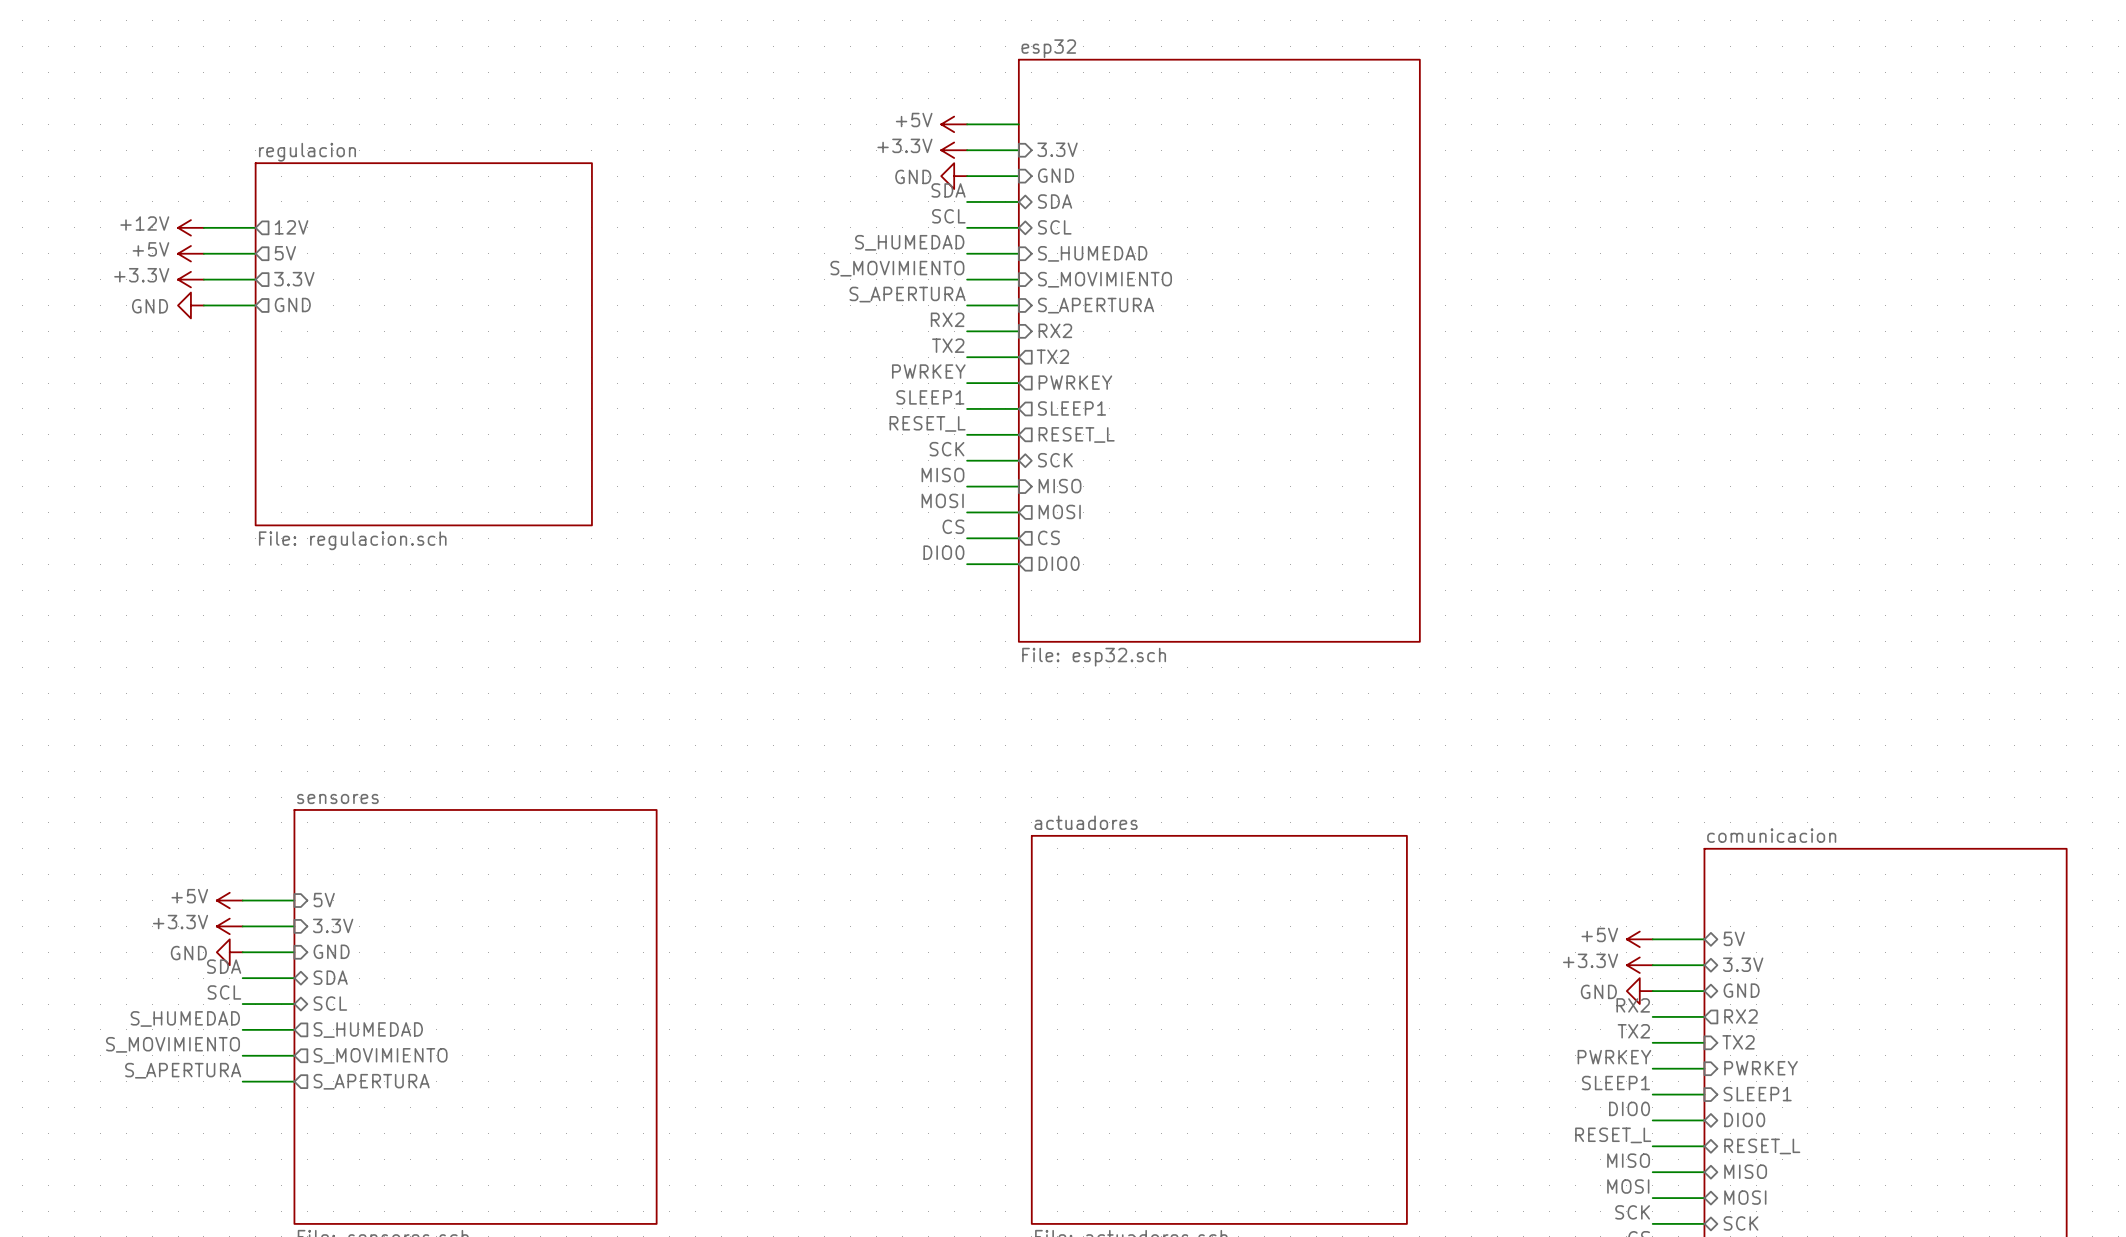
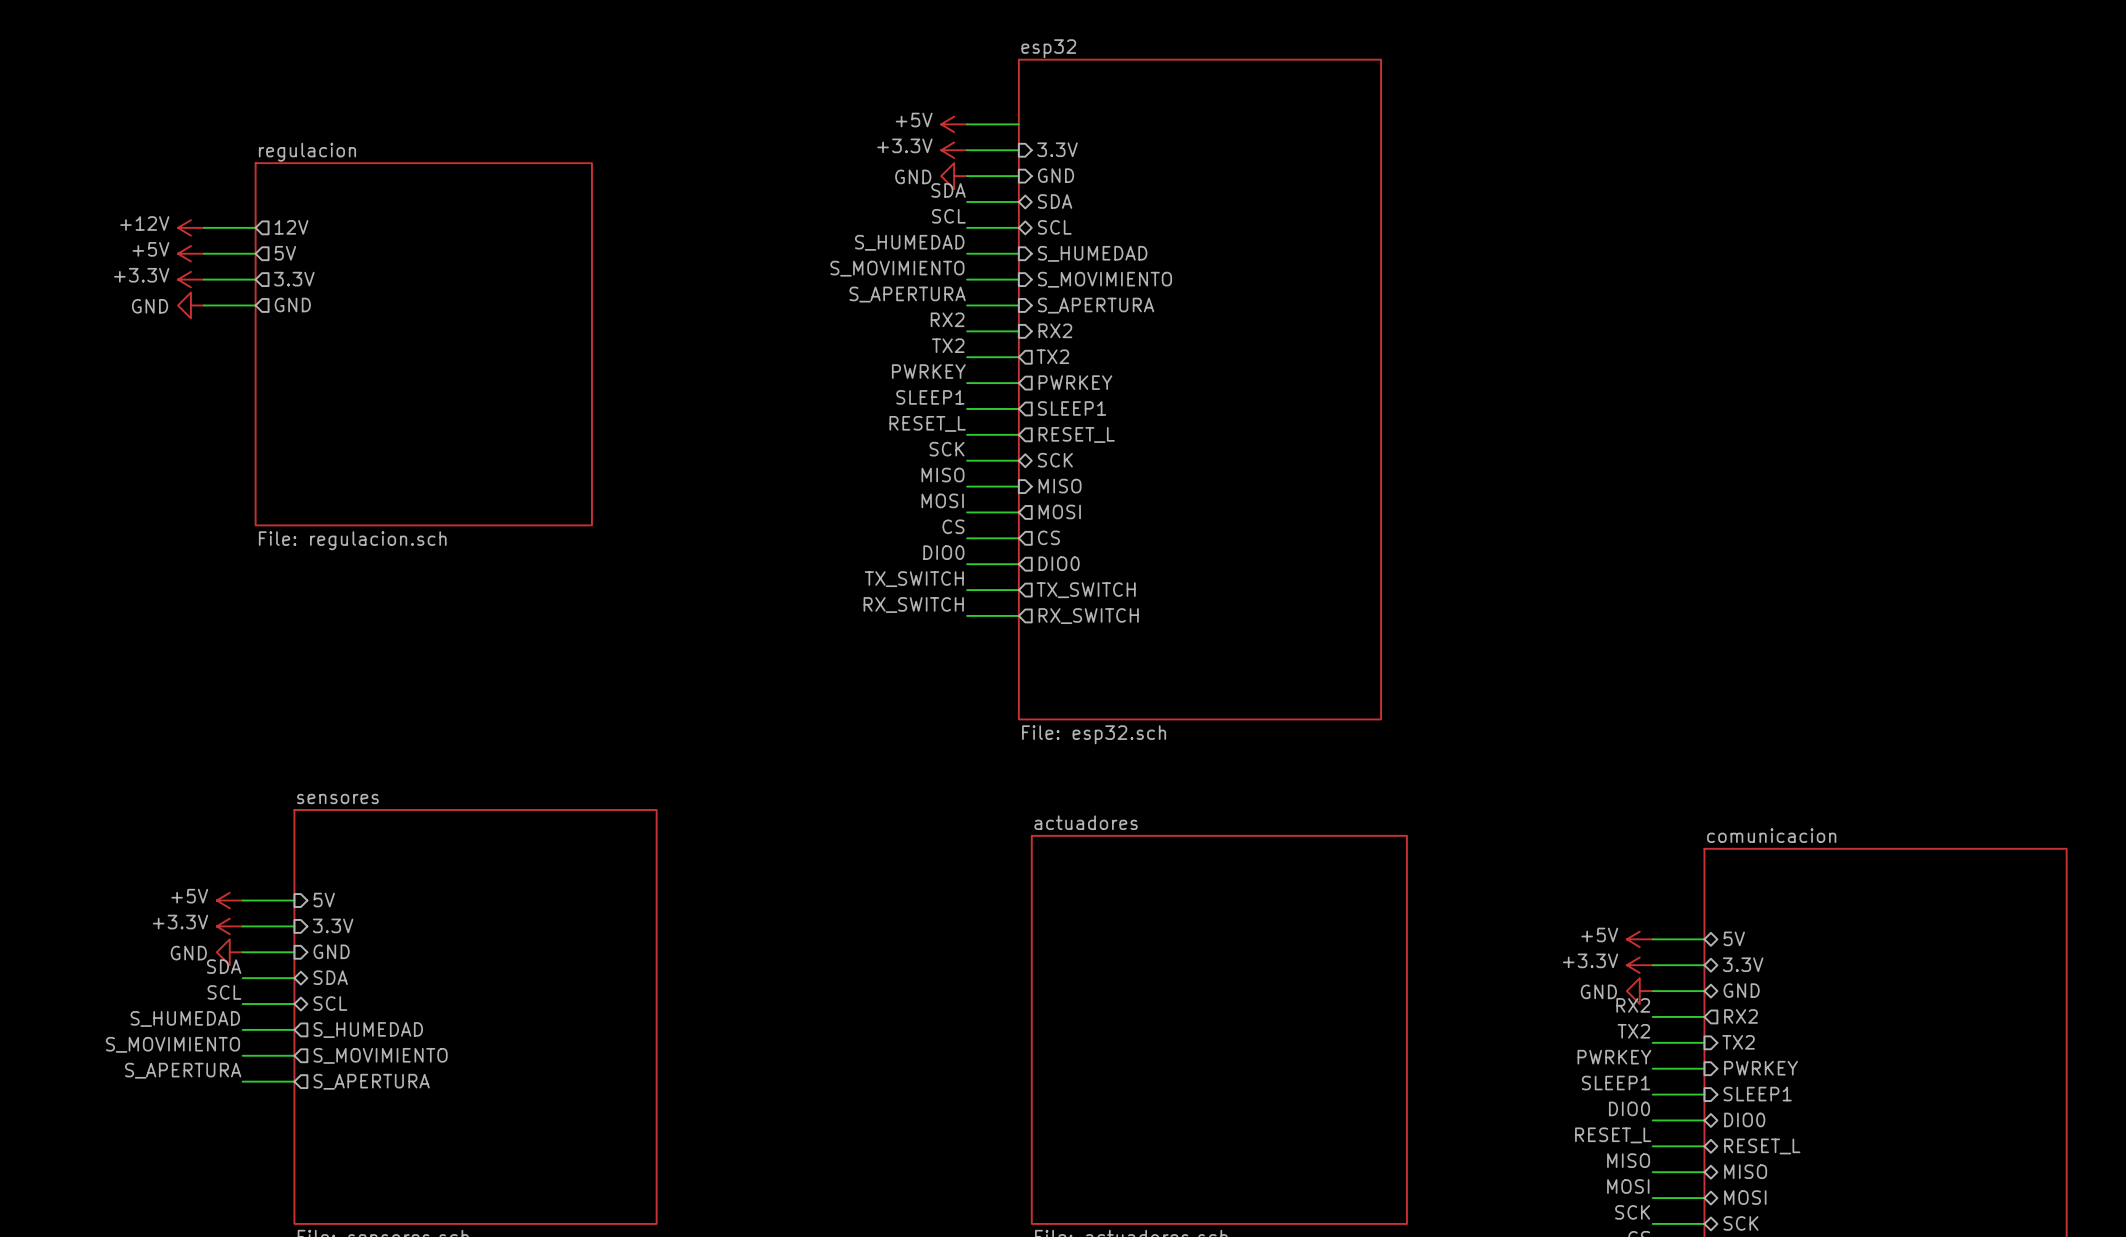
sheet esp32 shape: [1018, 59, 1420, 642] -> [1018, 59, 1382, 720]
label: none -> TX_SWITCH (914, 579)
wire: none -> (967, 590) (1018, 590)
sheet pin: none -> TX_SWITCH (1086, 590)
label: none -> RX_SWITCH (913, 605)
wire: none -> (967, 615) (1018, 615)
sheet pin: none -> RX_SWITCH (1088, 616)
sheet esp32 value position: File: esp32.sch (1094, 657) -> File: esp32.sch (1094, 734)

